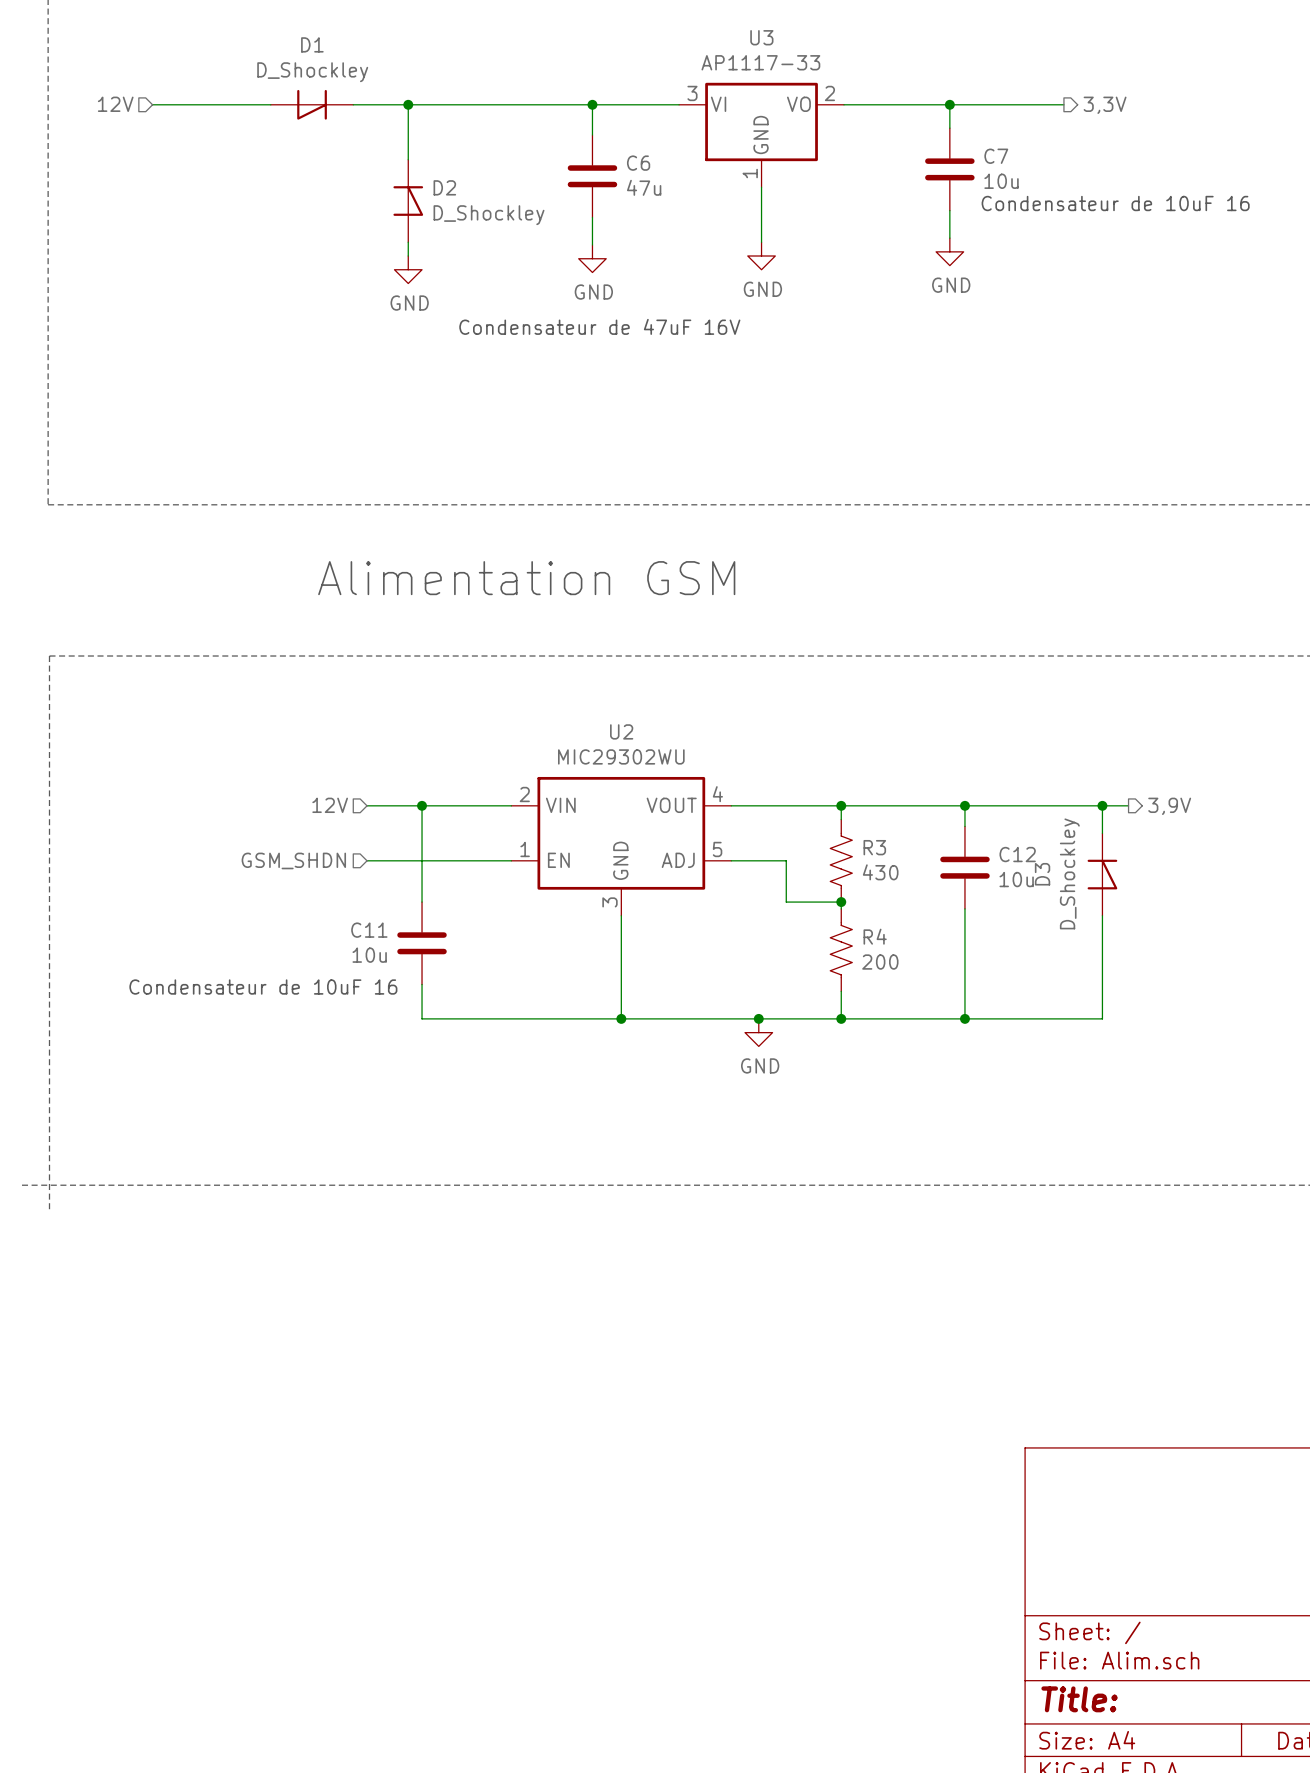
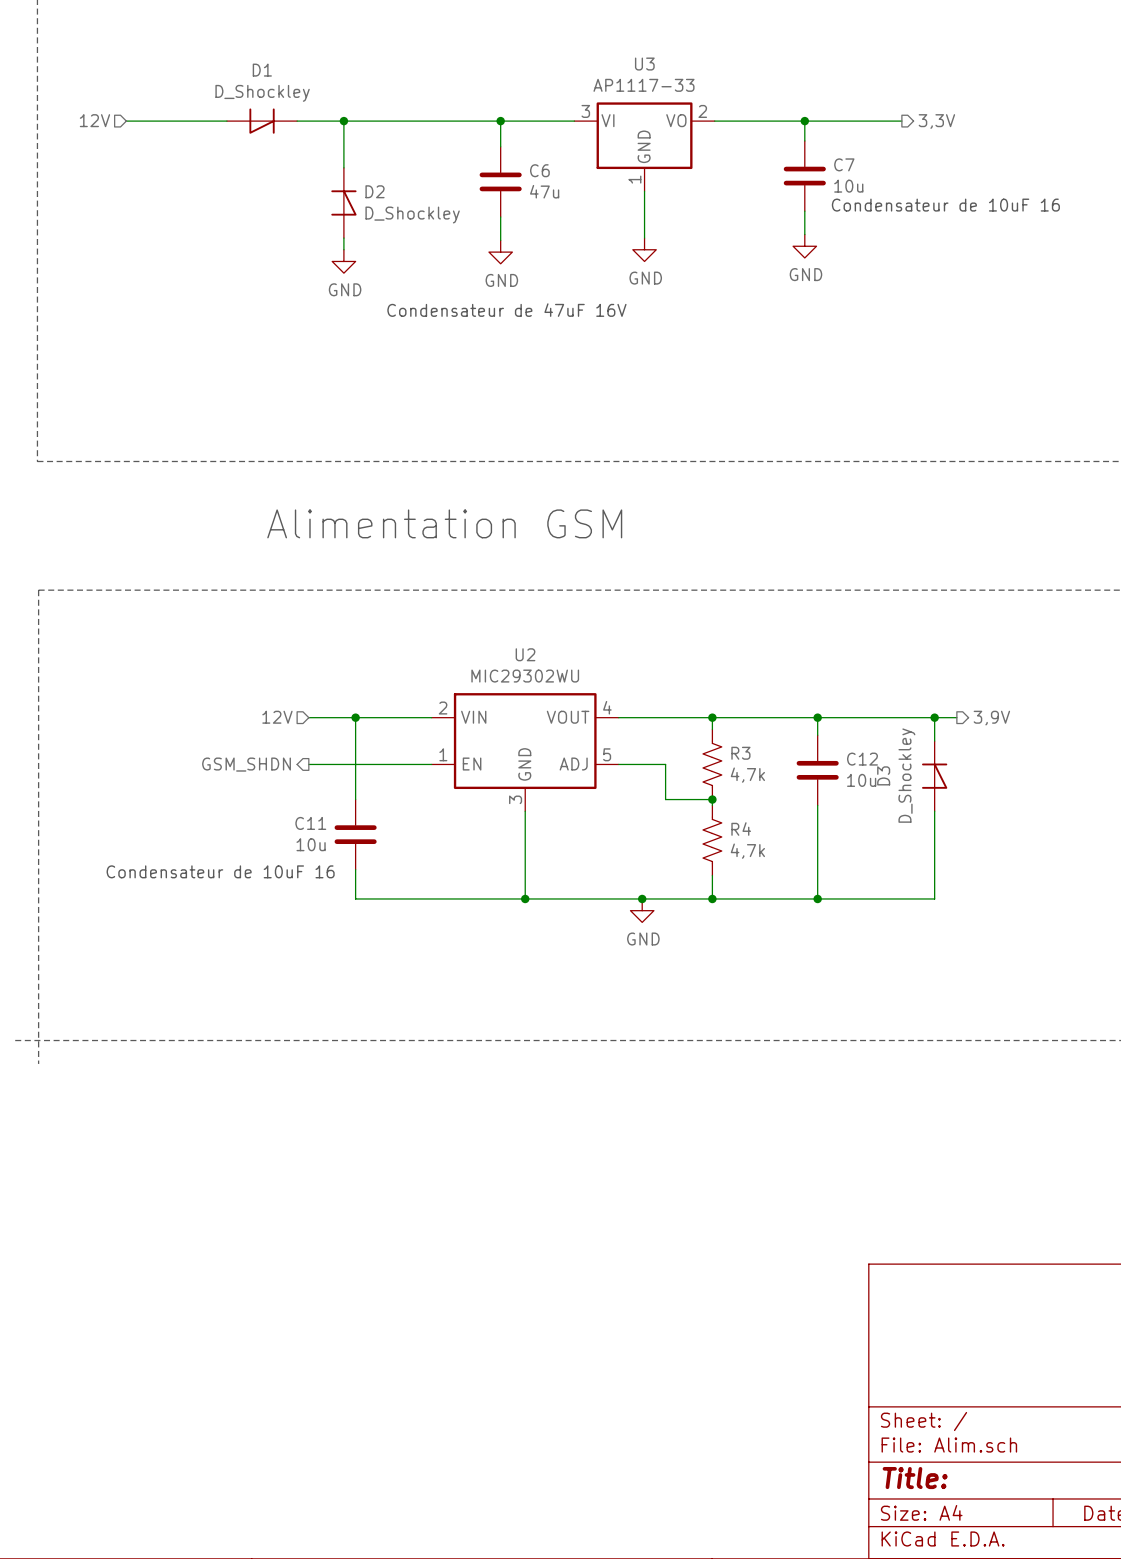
hierarchical label shape: input (293, 860) -> output (246, 764)
R3 value: 430 (880, 872) -> 4,7k (747, 775)
R4 value: 200 (880, 962) -> 4,7k (747, 851)

